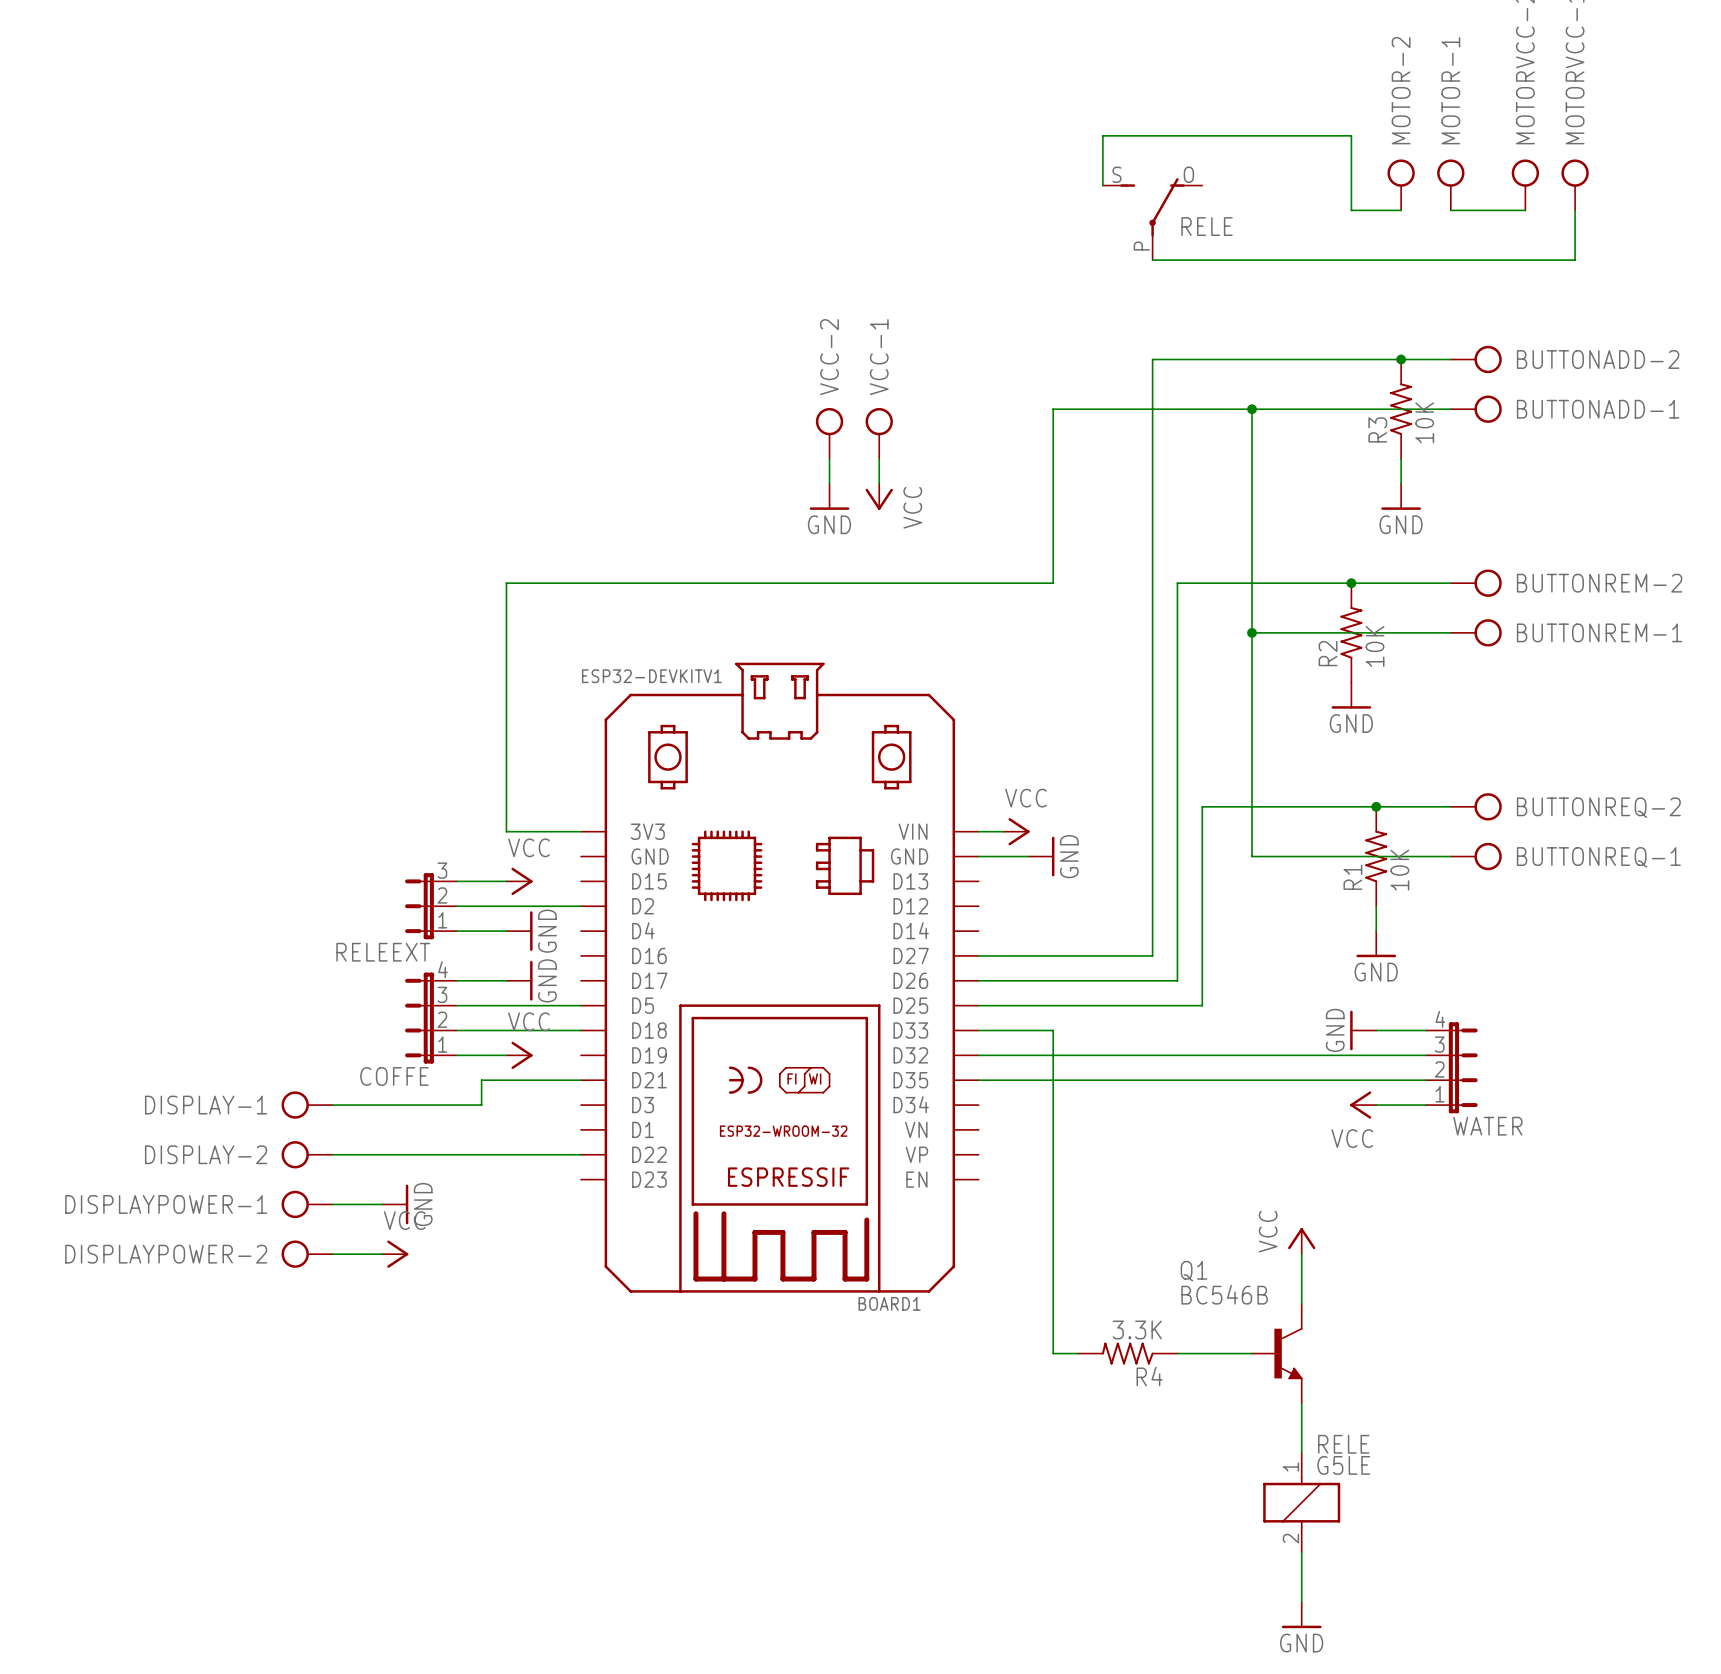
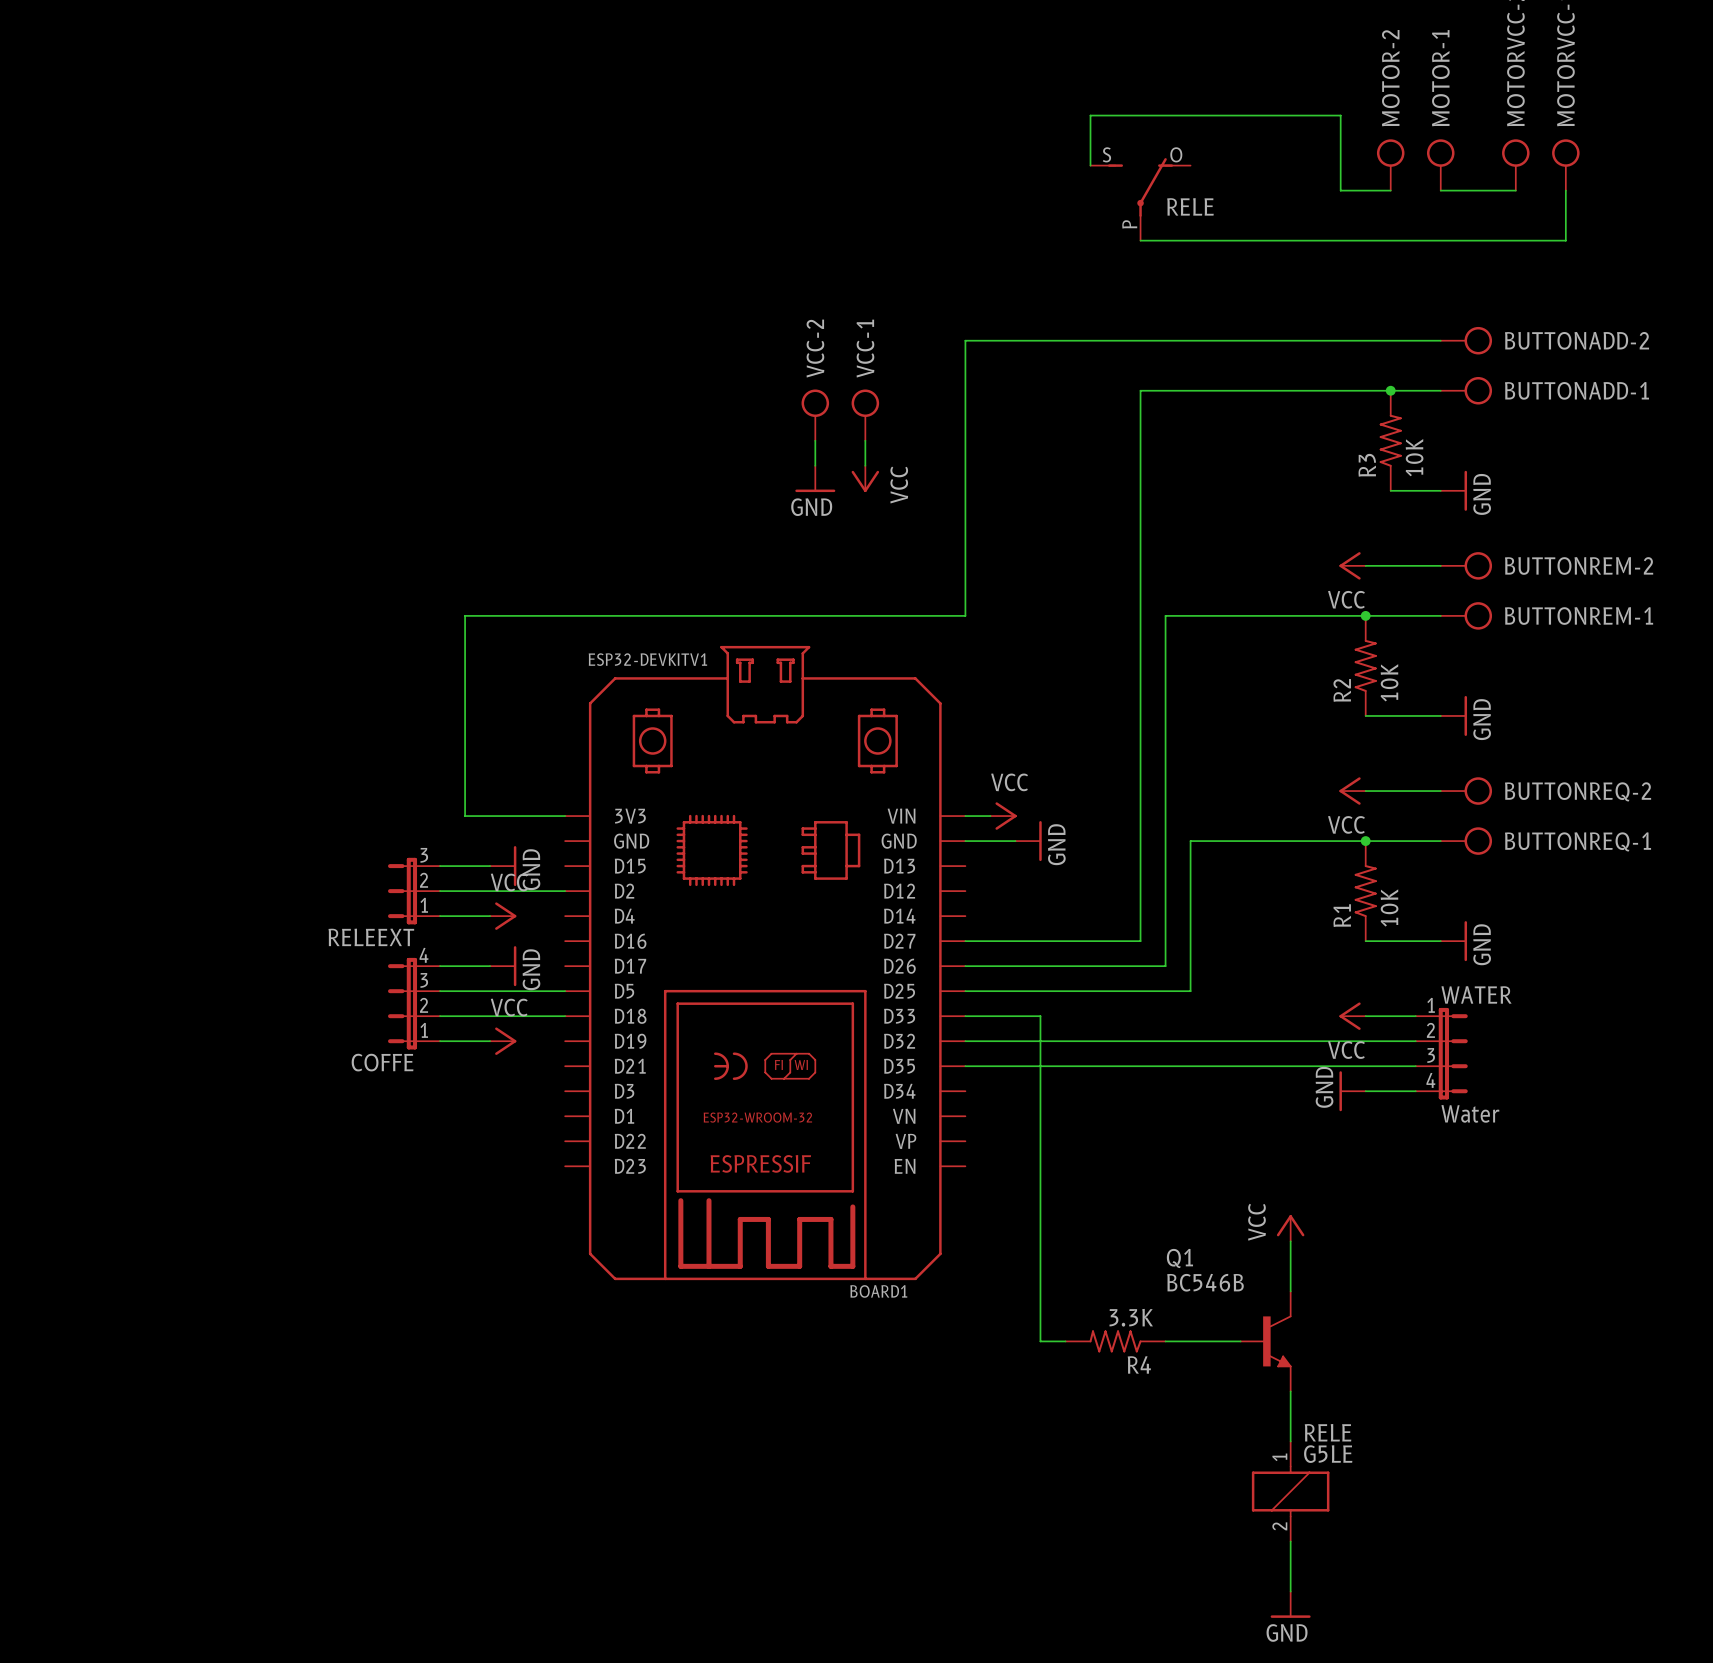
wire: (1152, 359) (1152, 409) (1053, 409) (1053, 583) (506, 583) (506, 831) -> (1140, 340) (965, 340) (965, 615) (465, 615) (465, 816) (490, 816)
junction position: (1401, 359) -> (1390, 390)
wire: (1252, 409) (1252, 856) -> none
junction: (1252, 409) -> none
R3 position: (1401, 409) -> (1390, 440)
wire: (1401, 458) (1401, 483) -> none
power symbol position: GND (1401, 496) -> GND (1453, 490)
wire: none -> (1390, 490) (1440, 490)
power symbol rotation: 0° (1401, 508) -> 90° counterclockwise (1465, 490)
junction position: (1351, 583) -> (1365, 615)
power symbol: none -> VCC (1352, 565)
wire: (1376, 583) (1177, 583) (1177, 632) -> (1240, 615) (1165, 615)
junction: (1252, 632) -> none
R2 position: (1351, 632) -> (1365, 665)
power symbol: GND (1351, 695) -> none
wire: none -> (1365, 715) (1440, 715)
power symbol: none -> GND (1453, 715)
power symbol: none -> VCC (1352, 791)
wire: (1376, 806) (1202, 806) (1202, 856) -> (1240, 841) (1190, 841)
junction position: (1376, 806) -> (1365, 841)
R1 position: (1376, 856) -> (1365, 891)
power symbol: VCC (519, 881) -> GND (503, 866)
wire: (1376, 906) (1376, 931) -> none
power symbol: GND (519, 931) -> VCC (503, 916)
power symbol position: GND (1376, 944) -> GND (1453, 941)
wire: none -> (1365, 941) (1440, 941)
power symbol rotation: 0° (1376, 955) -> 90° counterclockwise (1465, 941)
power symbol: GND (1363, 1030) -> VCC (1352, 1016)
WATER flip: as is (1463, 1067) -> up-down (1453, 1053)
wire: (581, 1080) (481, 1080) (481, 1105) (332, 1105) -> none
DISPLAY-1: (307, 1105) -> none
power symbol: VCC (1363, 1105) -> GND (1352, 1091)
WATER value: none -> Water (1470, 1113)
DISPLAY-2: (307, 1154) -> none
wire: (332, 1154) (581, 1154) -> none
DISPLAYPOWER-1: (307, 1204) -> none
wire: (332, 1204) (382, 1204) -> none
power symbol: GND (395, 1204) -> none
DISPLAYPOWER-2: (307, 1254) -> none
wire: (332, 1254) (382, 1254) -> none
power symbol: VCC (395, 1254) -> none

